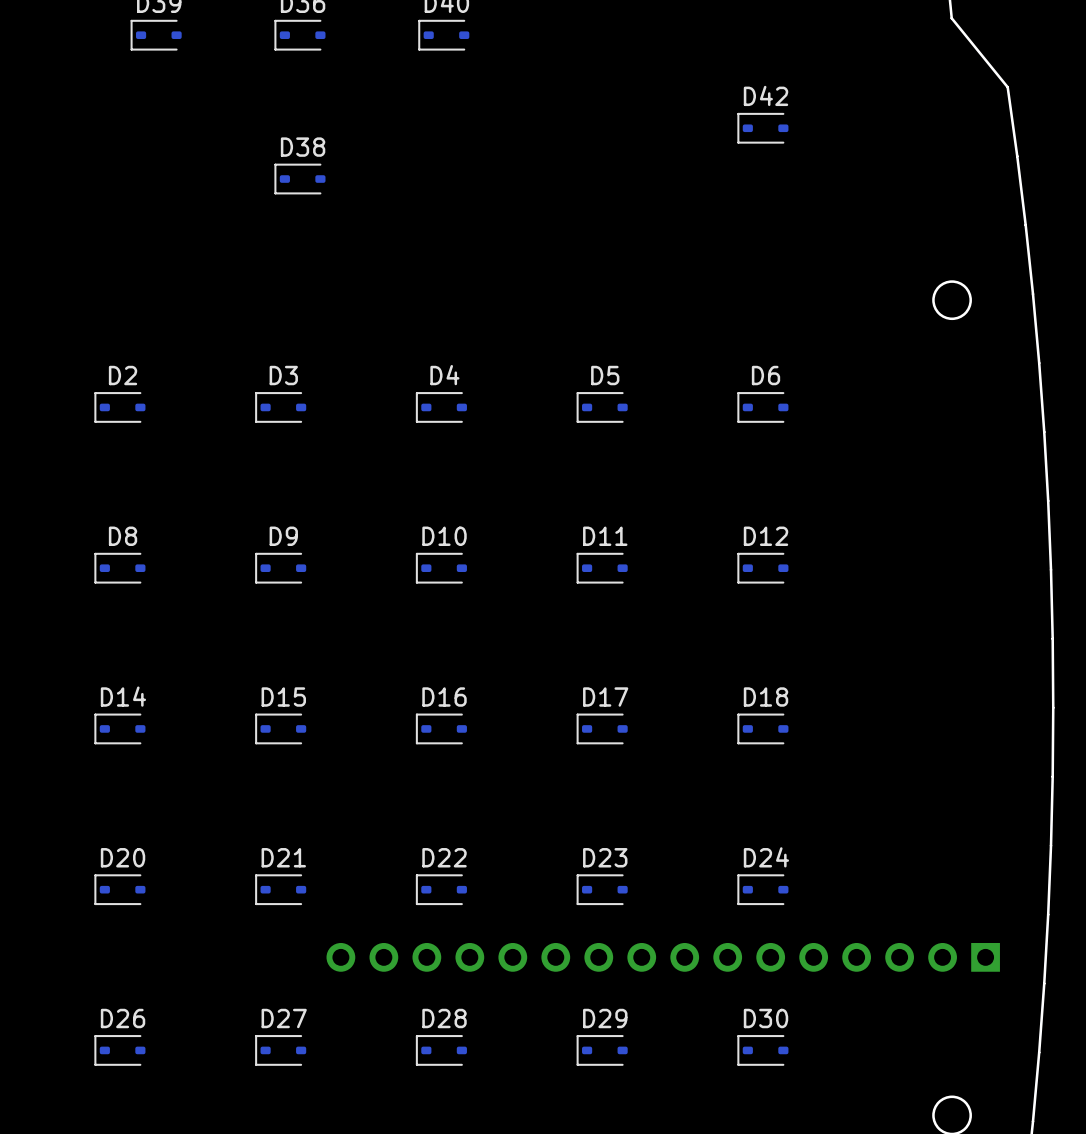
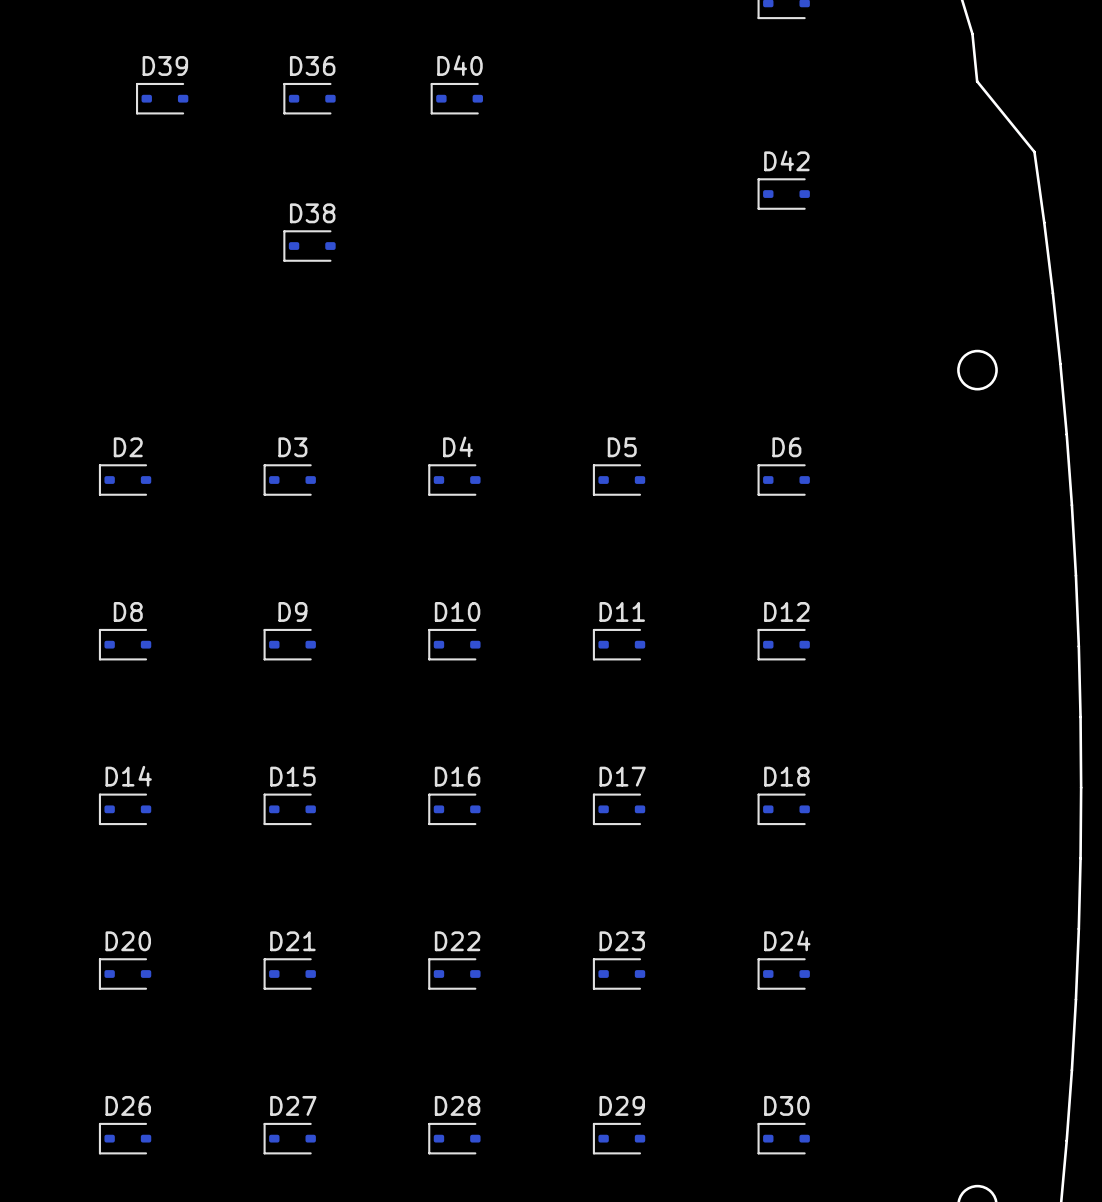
part: (663, 957) -> none

